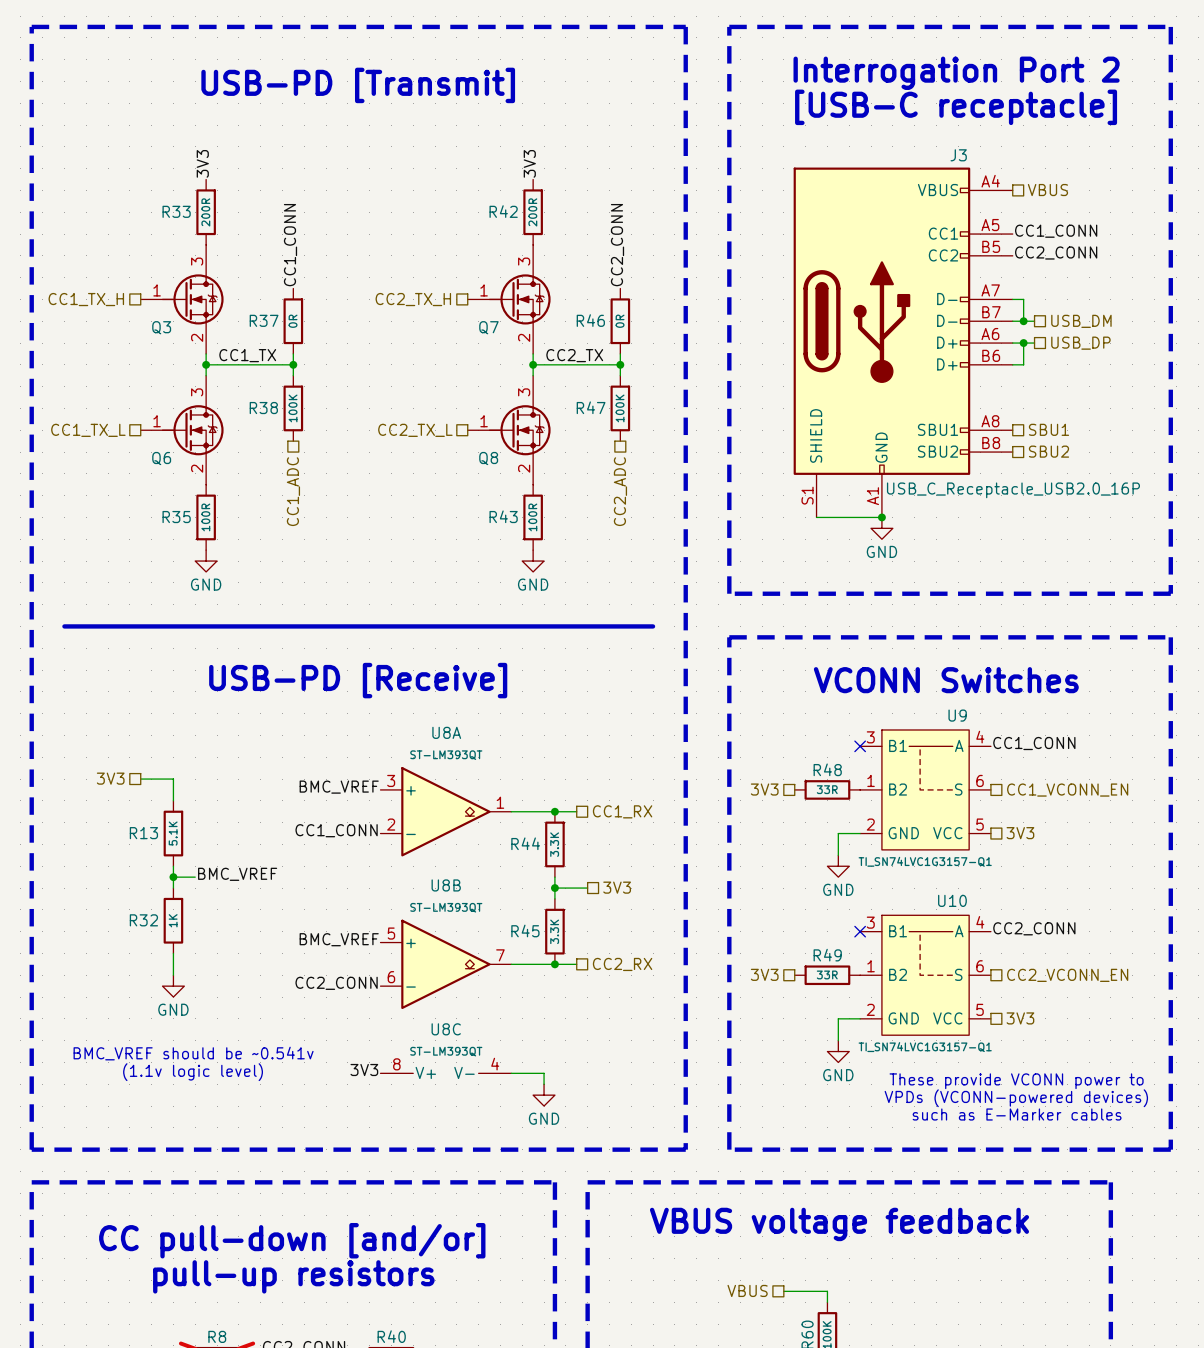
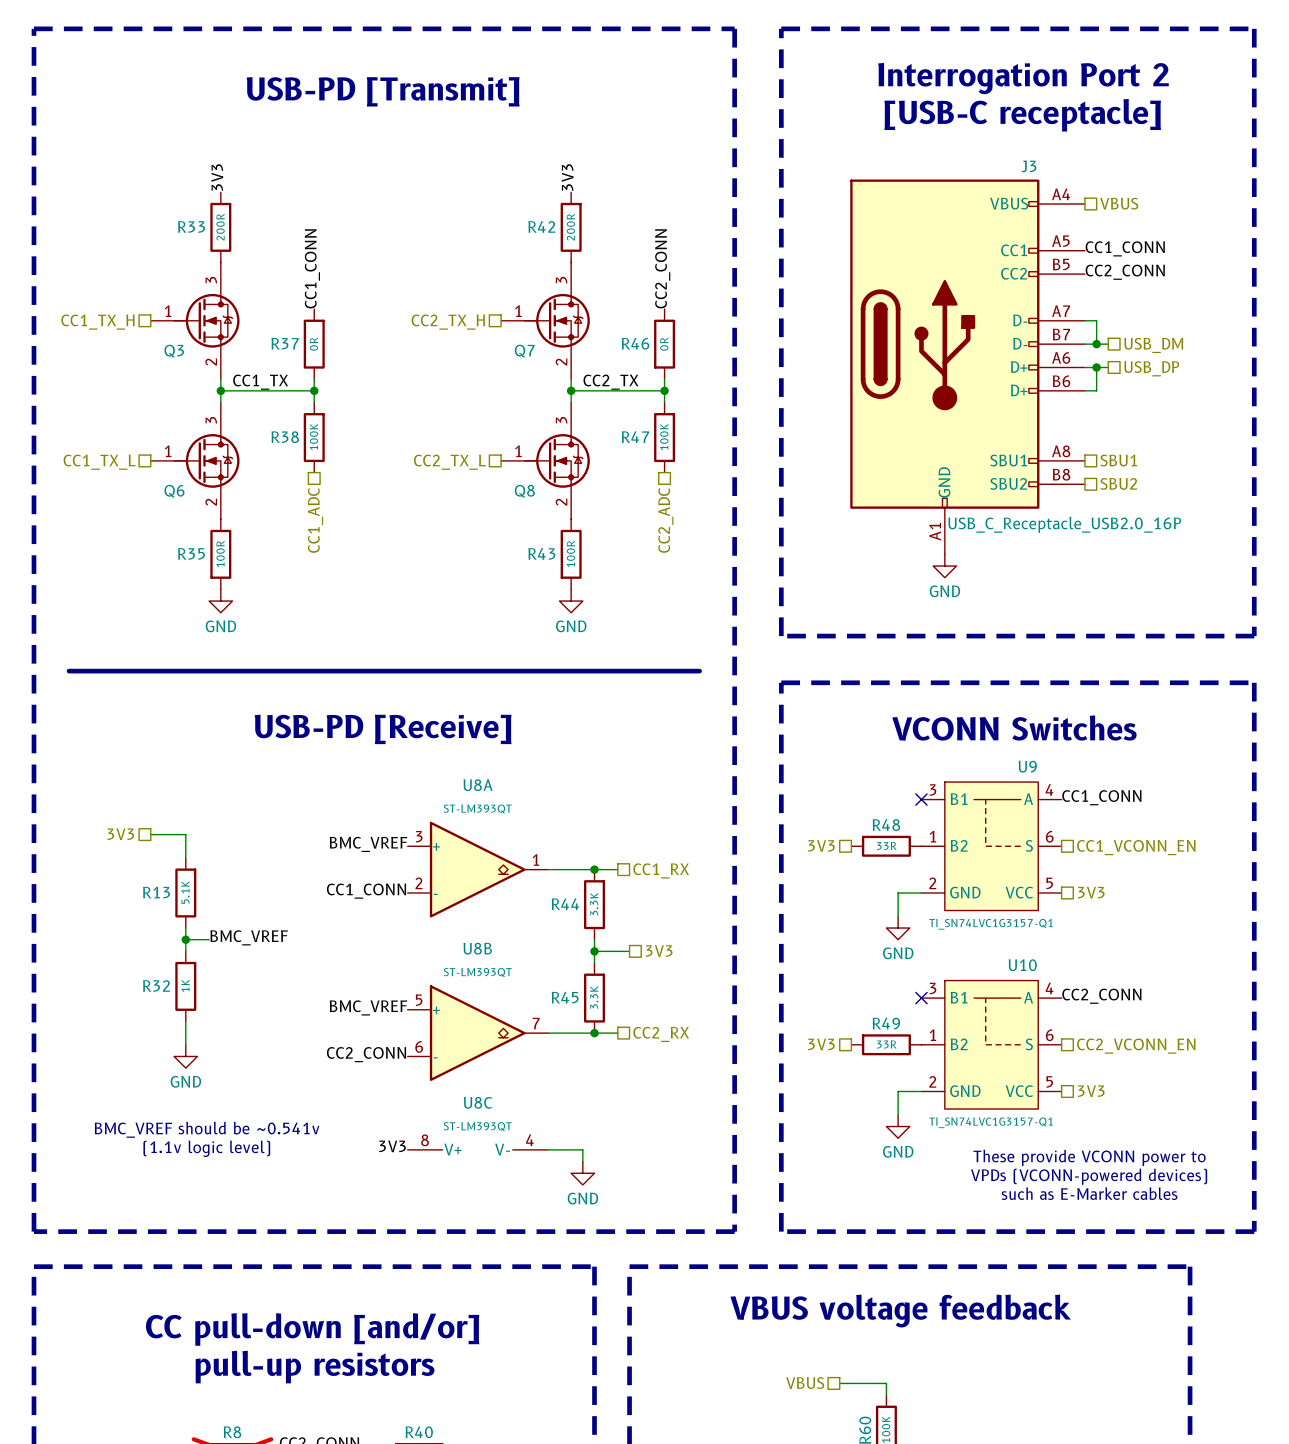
J3 symbol: [793, 167, 1013, 518] -> [850, 179, 1085, 555]
wire: (816, 517) (881, 517) -> none
junction: (881, 517) -> none

